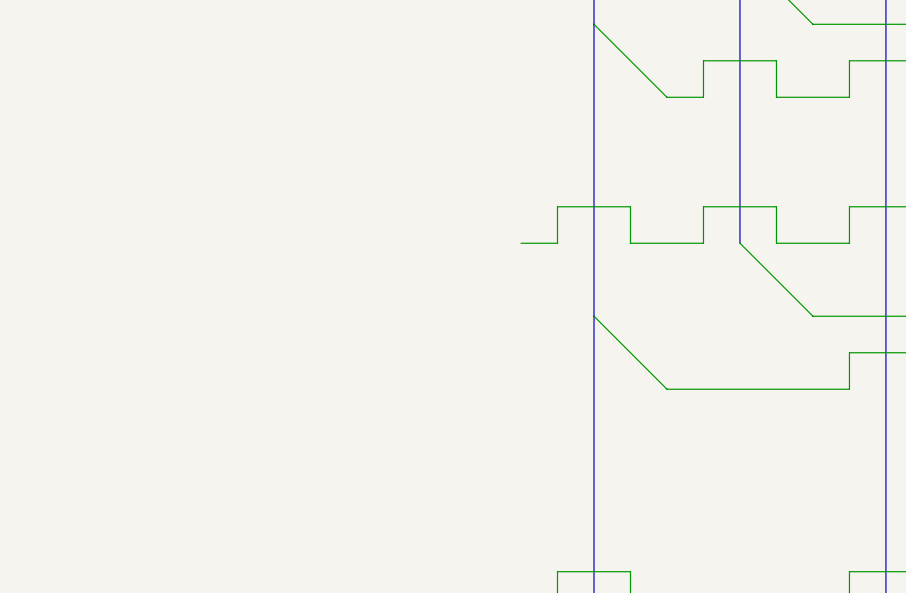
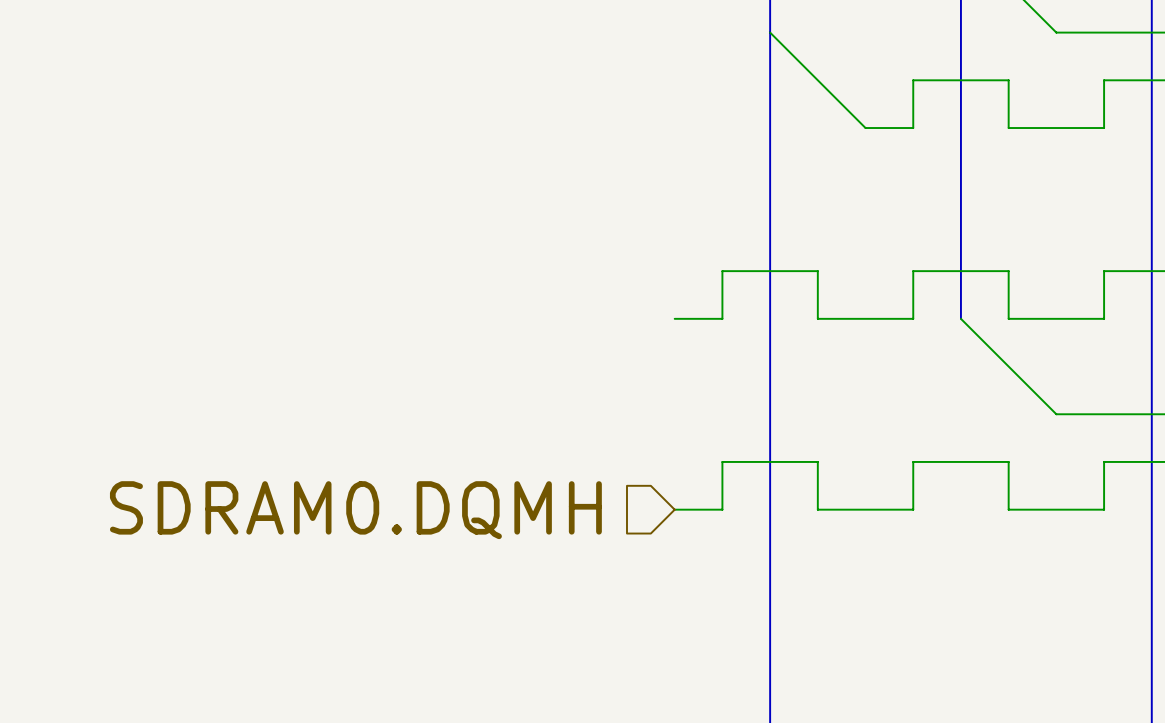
wire: (593, 316) (666, 389) -> (674, 509) (722, 509) (722, 461) (817, 461) (817, 509) (865, 509)
wire: (703, 389) (776, 389) -> (913, 509) (913, 461) (1008, 461) (1008, 509)
hierarchical label: none -> SDRAM0.DQMH (355, 510)

